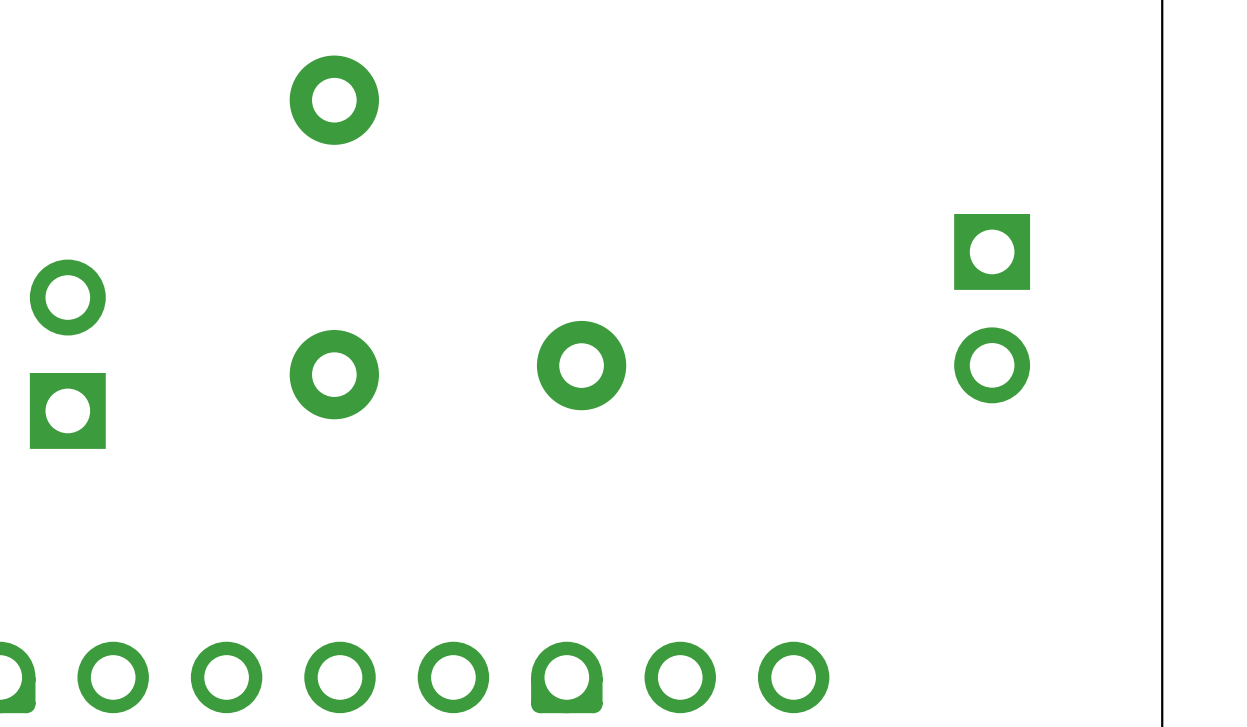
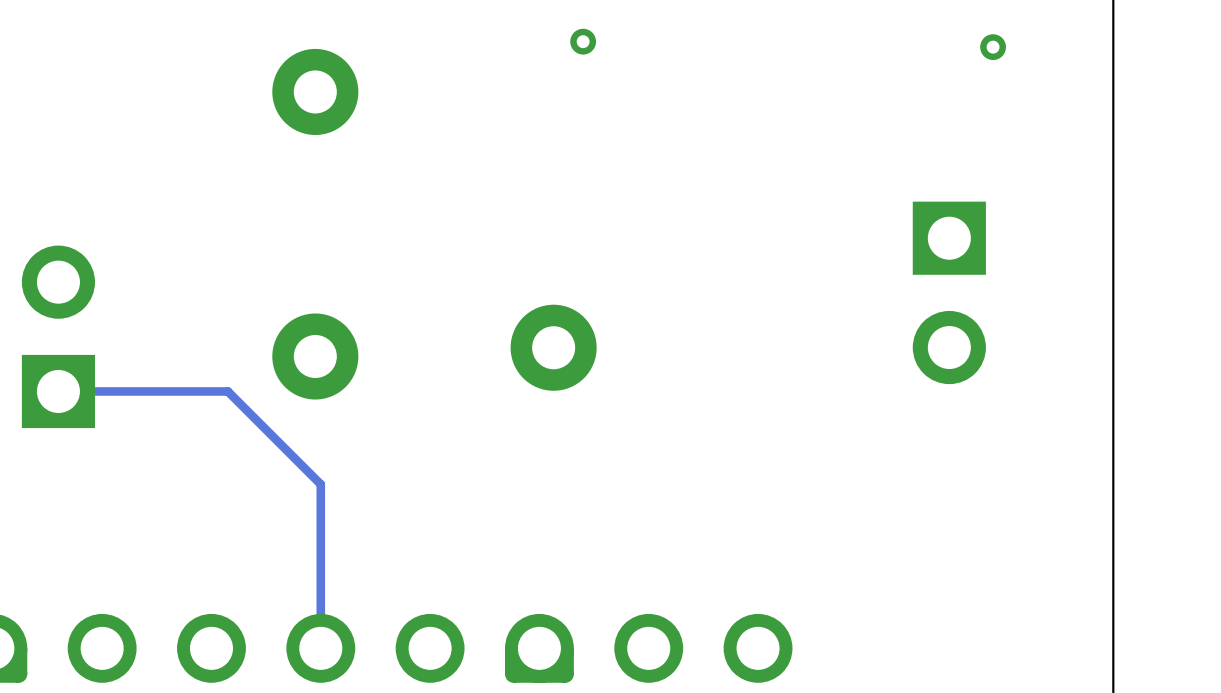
via: none -> (583, 41)
via: none -> (993, 47)
track: none -> (58, 391) (227, 391) (320, 484) (320, 648)

